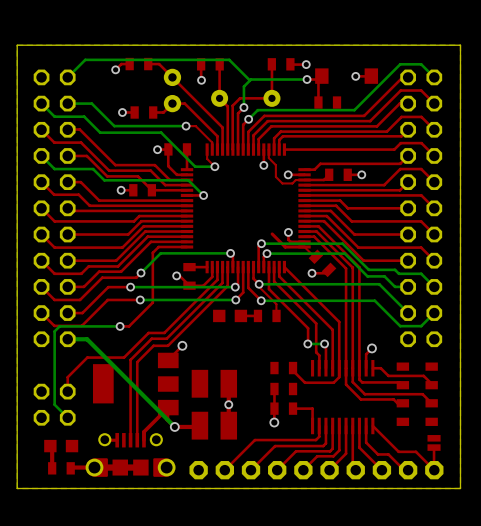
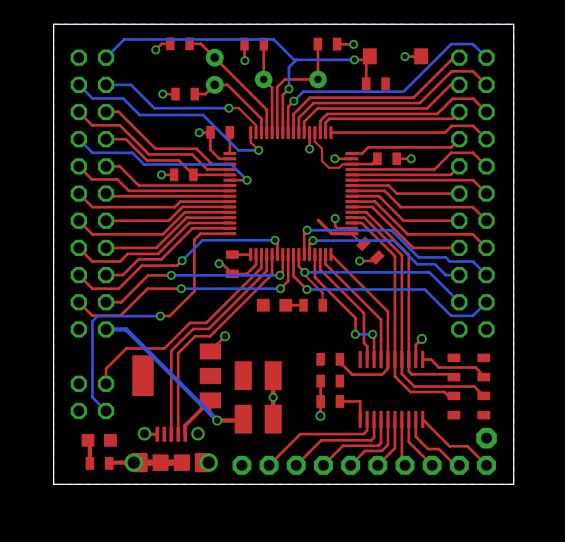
part footprint: [427, 435, 441, 451] -> [476, 427, 497, 449]
top track: (434, 447) (434, 469) -> none

